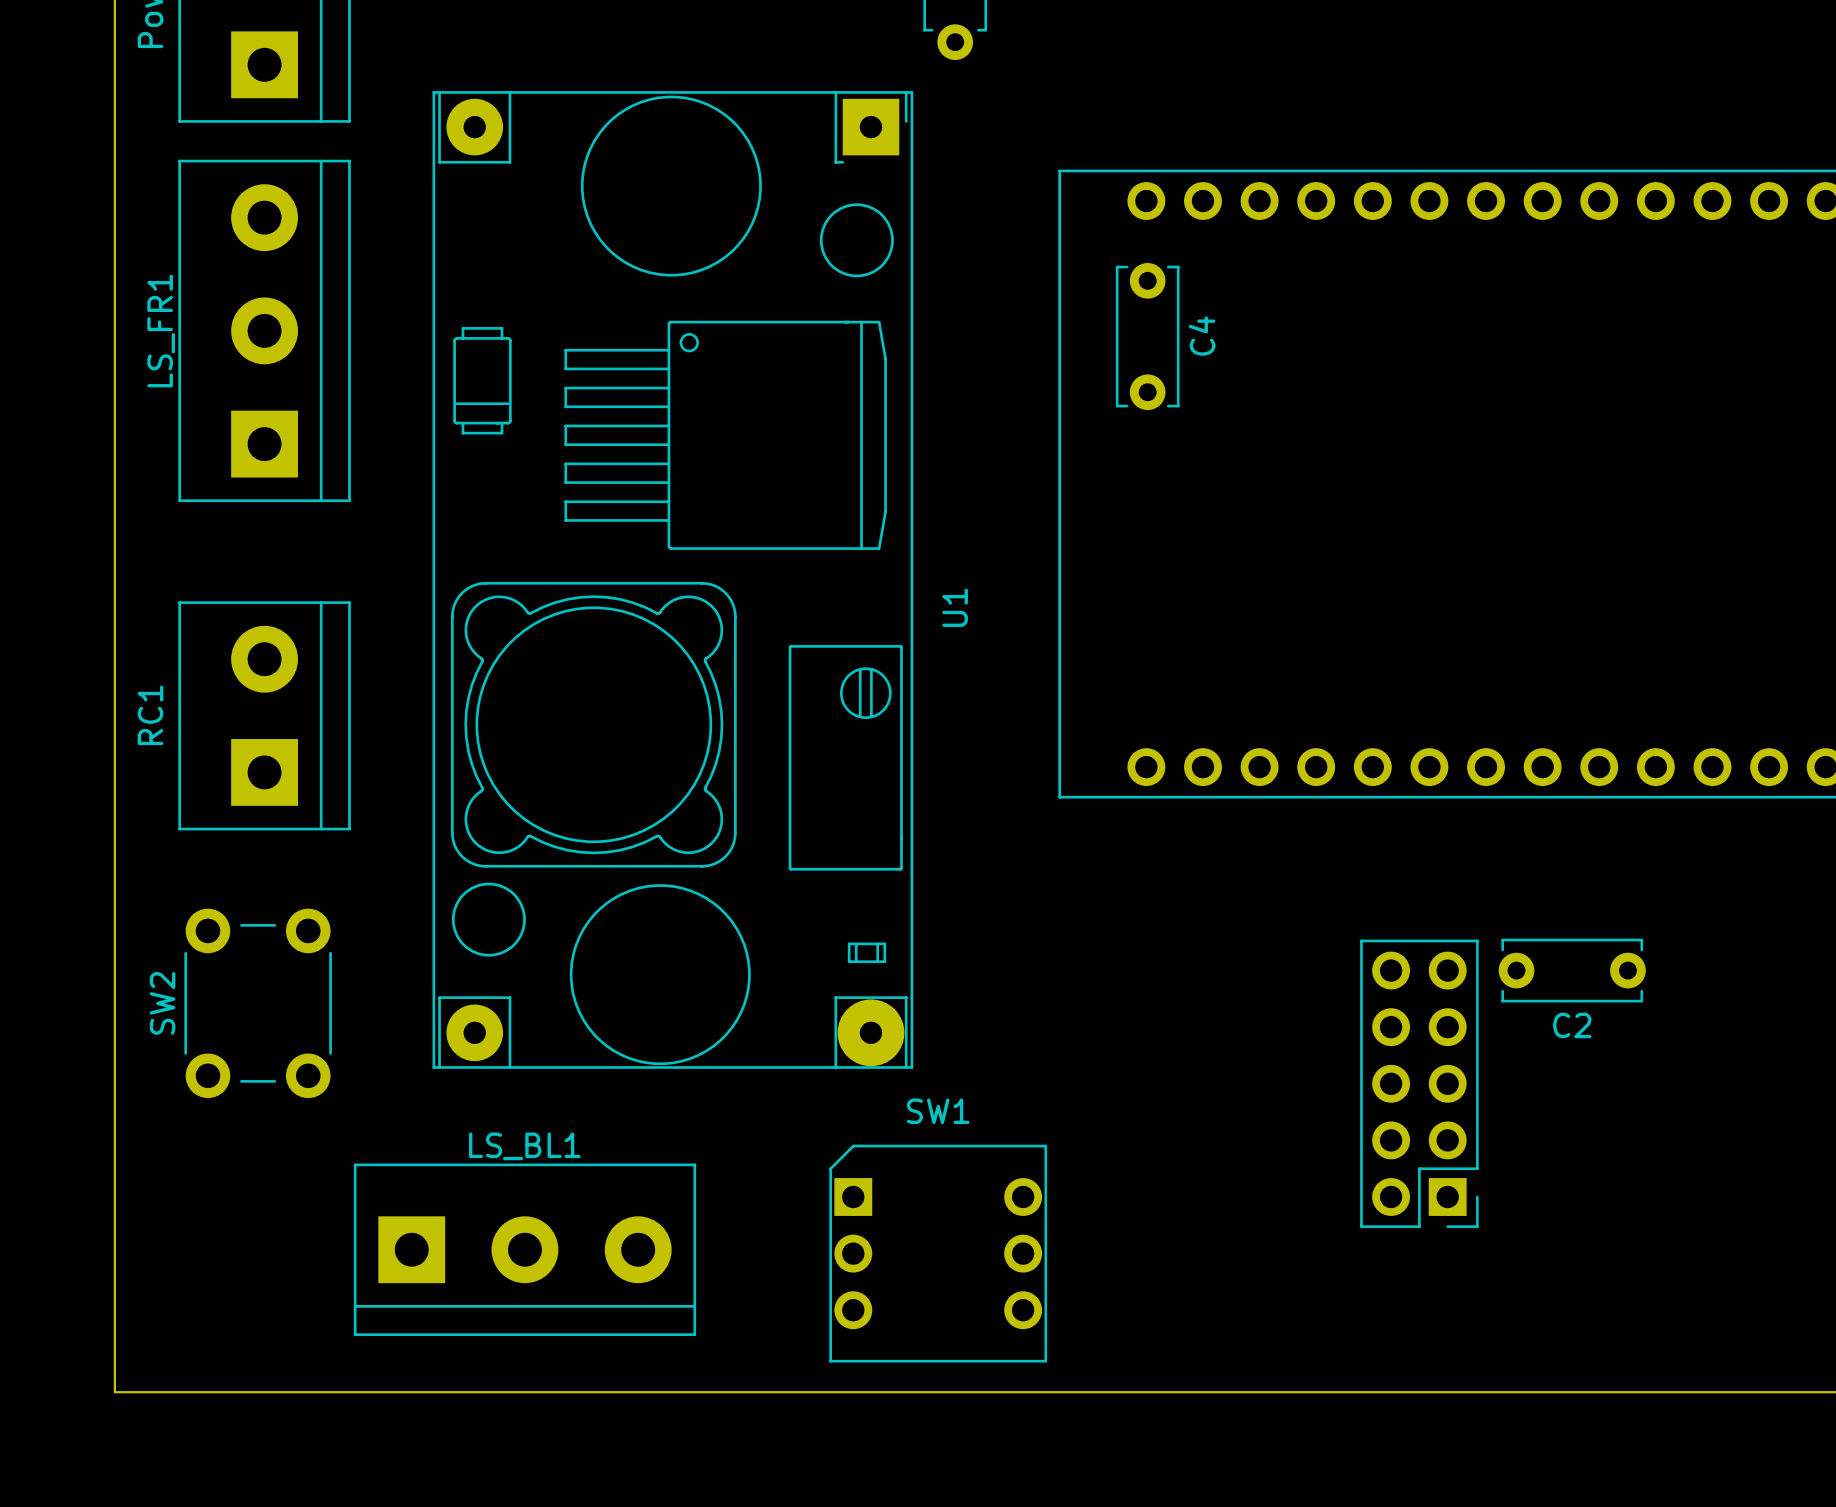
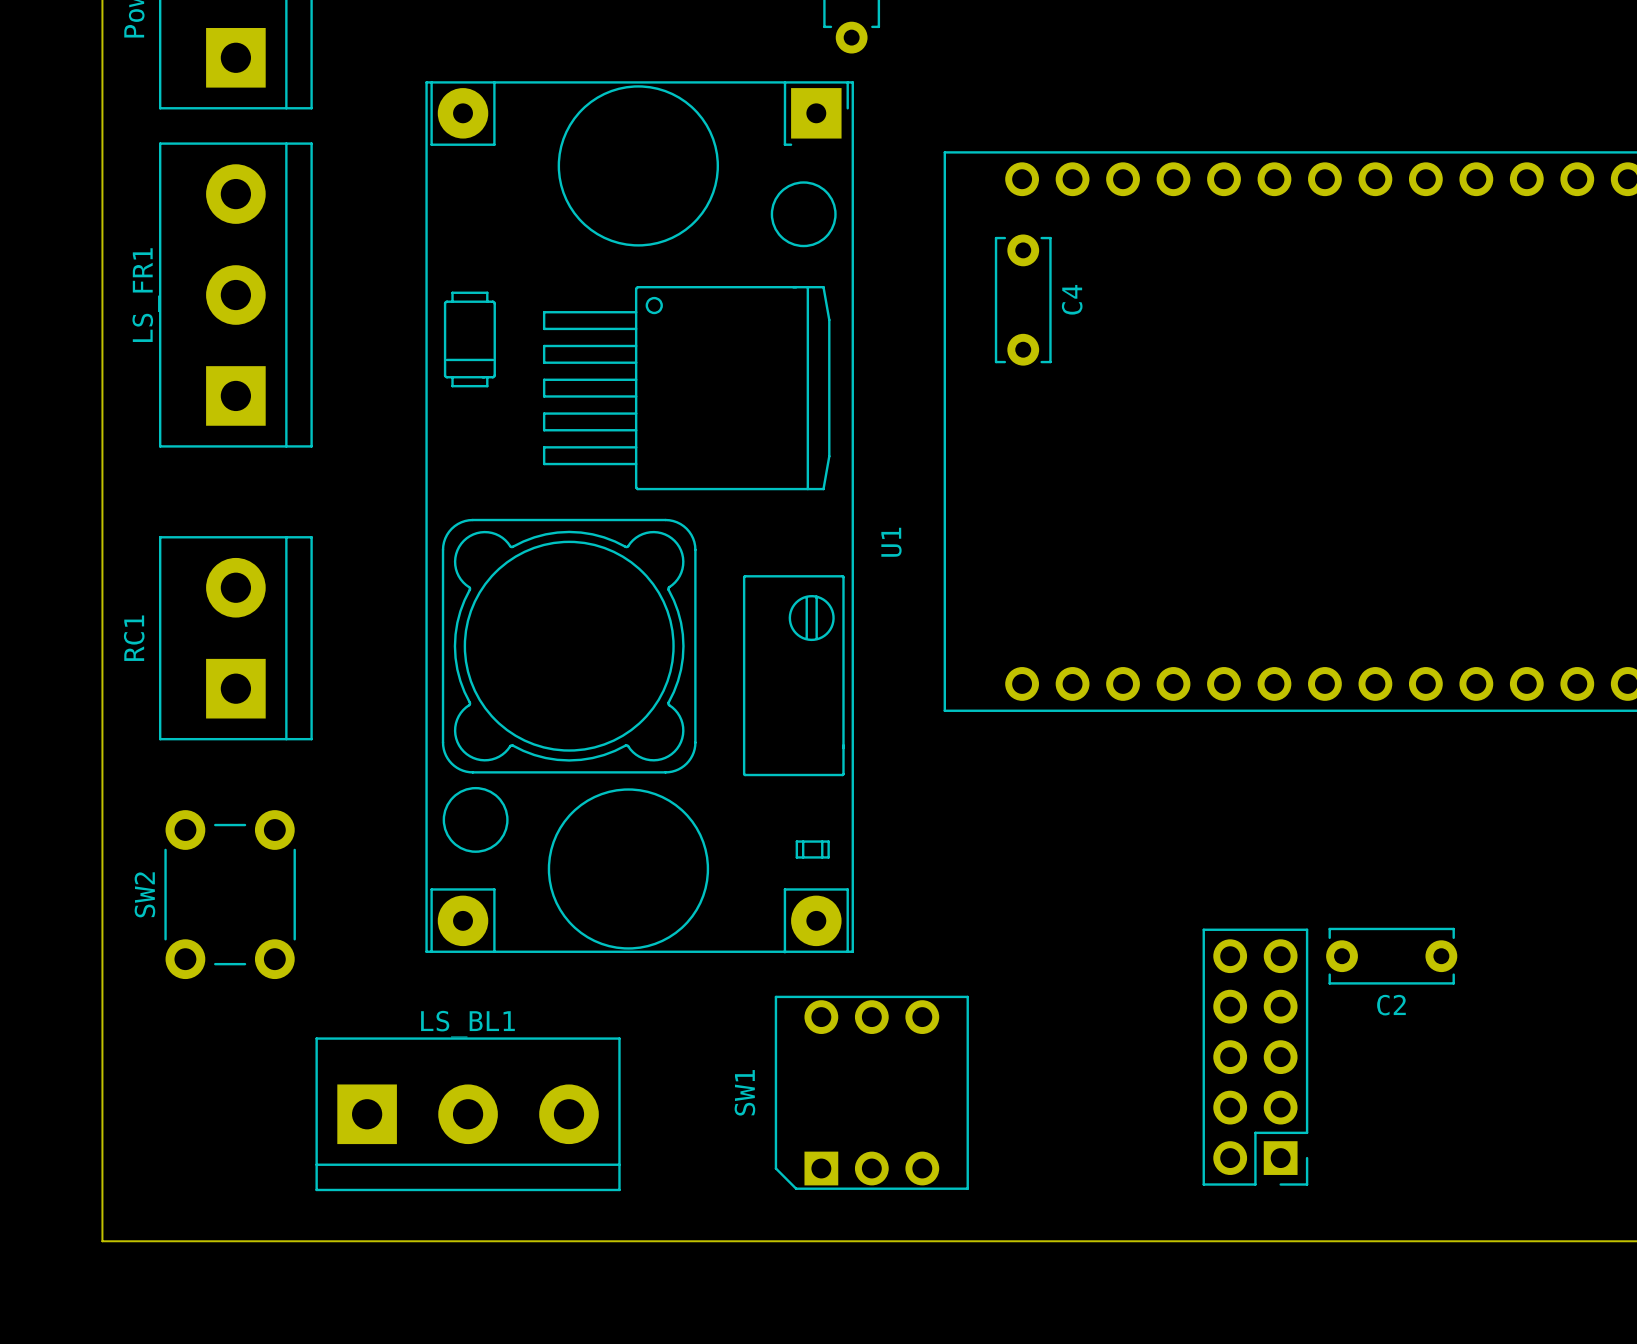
U1 footprint: [432, 91, 914, 1070] -> [425, 81, 854, 954]
C2 position: (1572, 970) -> (1391, 956)
part position: (1419, 1083) -> (1255, 1057)
SW1 rotation: 0° (938, 1253) -> 90° counterclockwise (871, 1092)

